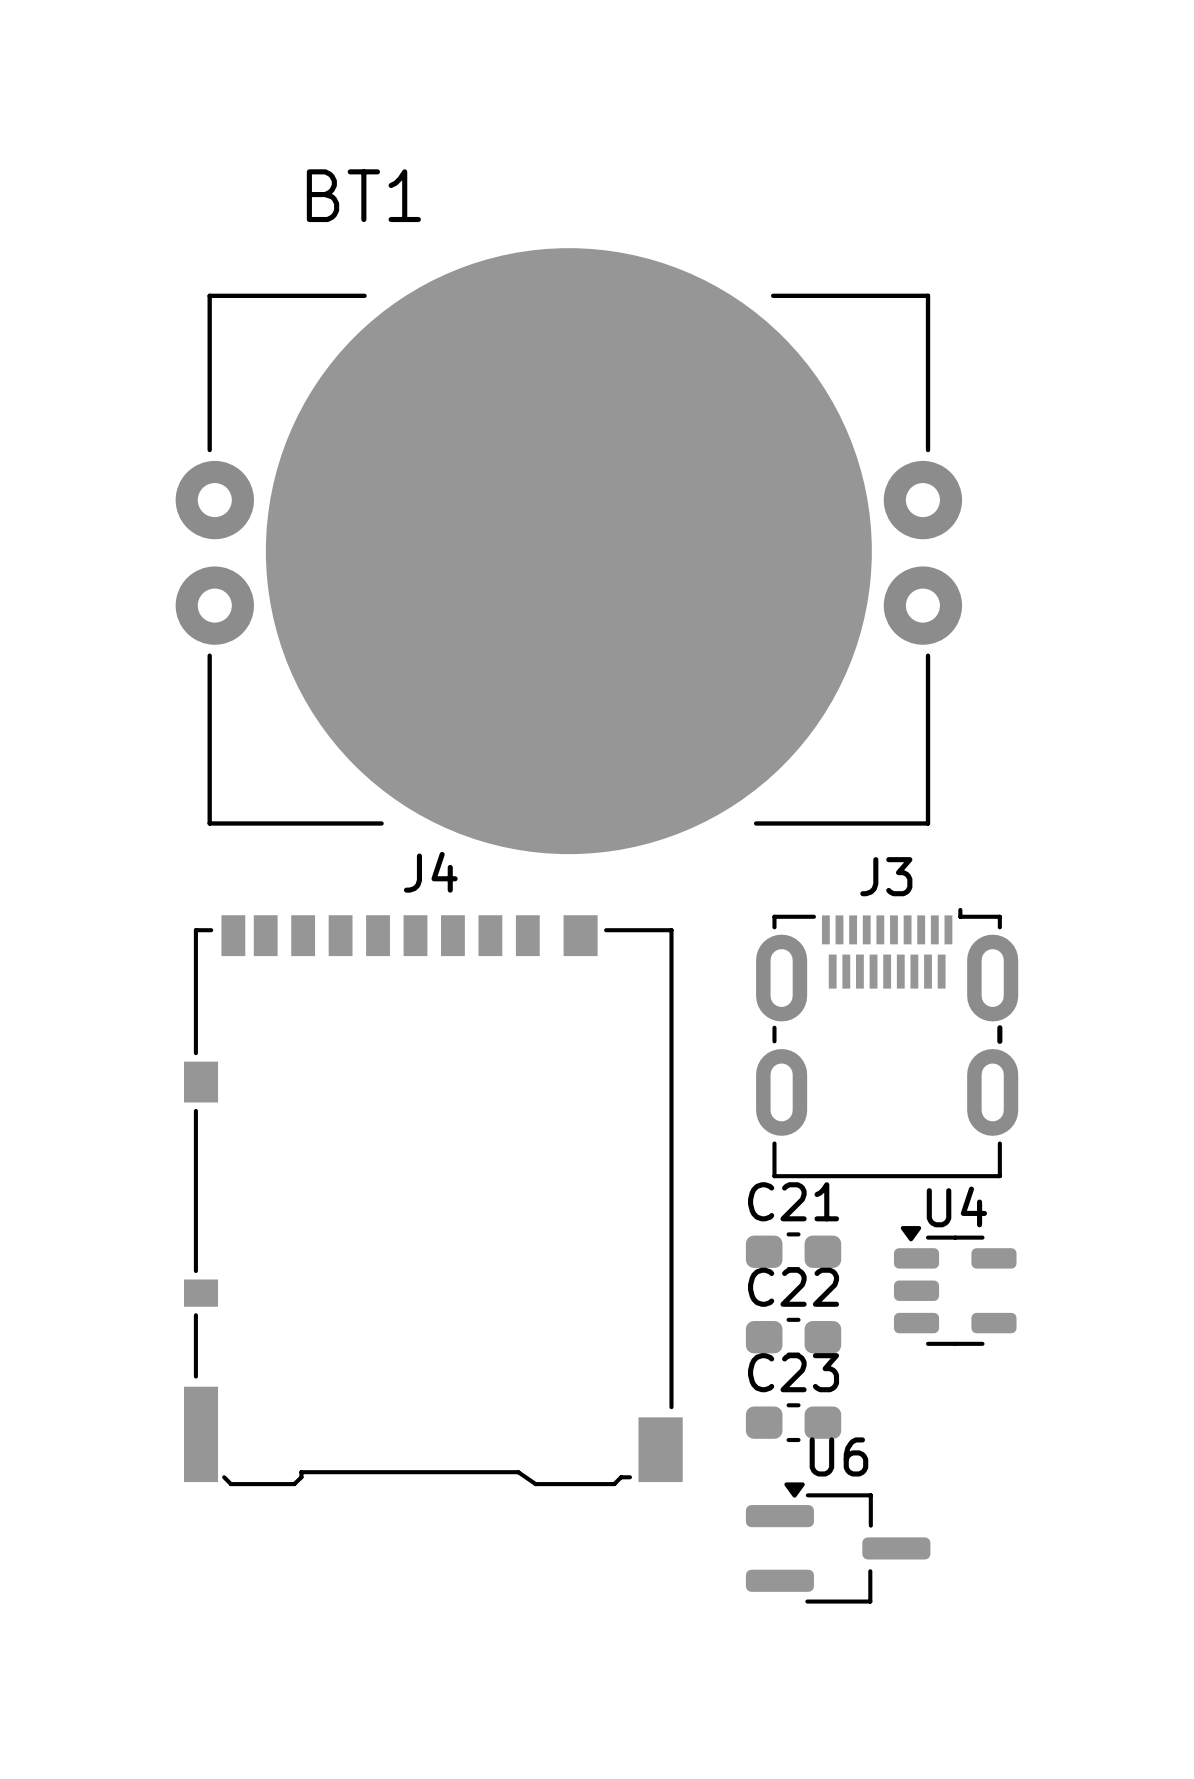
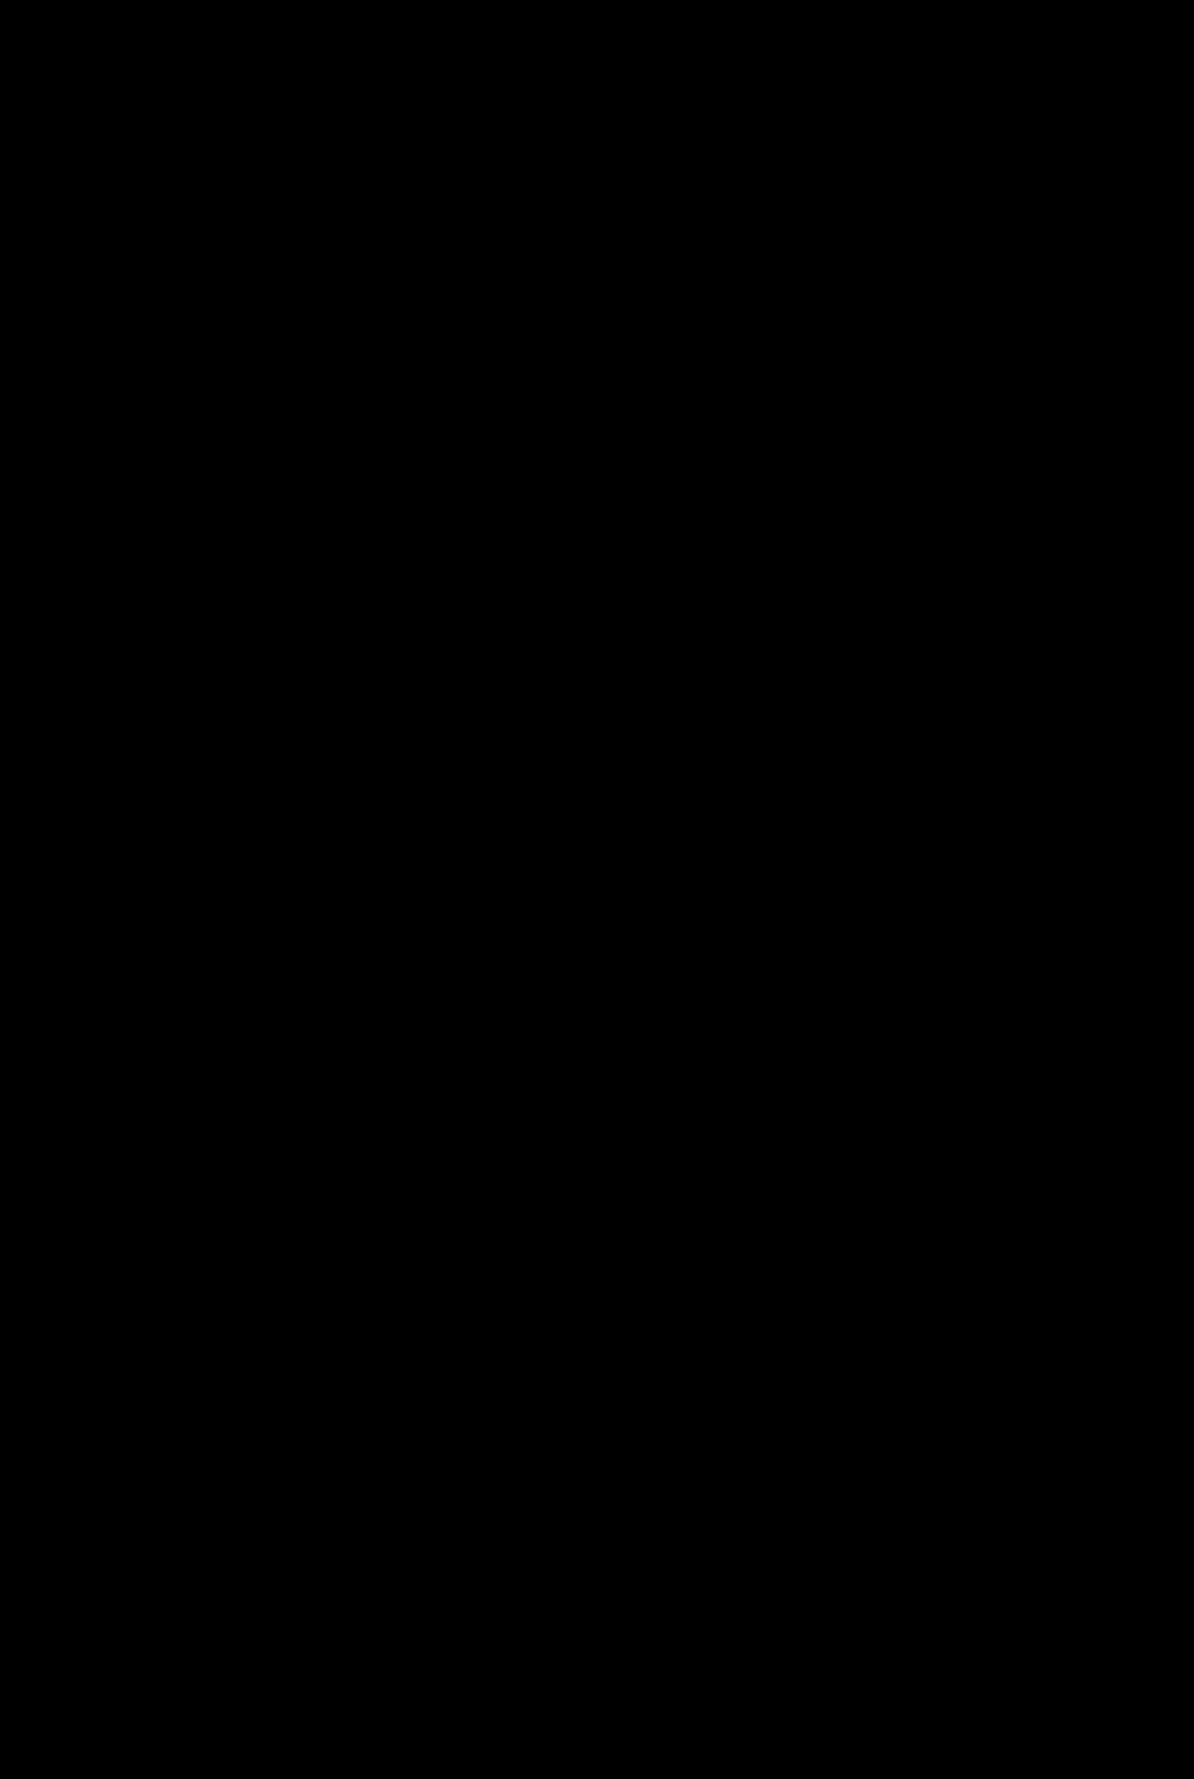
BT1: (568, 551) -> none
J3: (887, 1043) -> none
J4: (433, 1200) -> none
C21: (793, 1251) -> none
U4: (955, 1285) -> none
C22: (793, 1337) -> none
C23: (793, 1422) -> none
U6: (838, 1542) -> none

